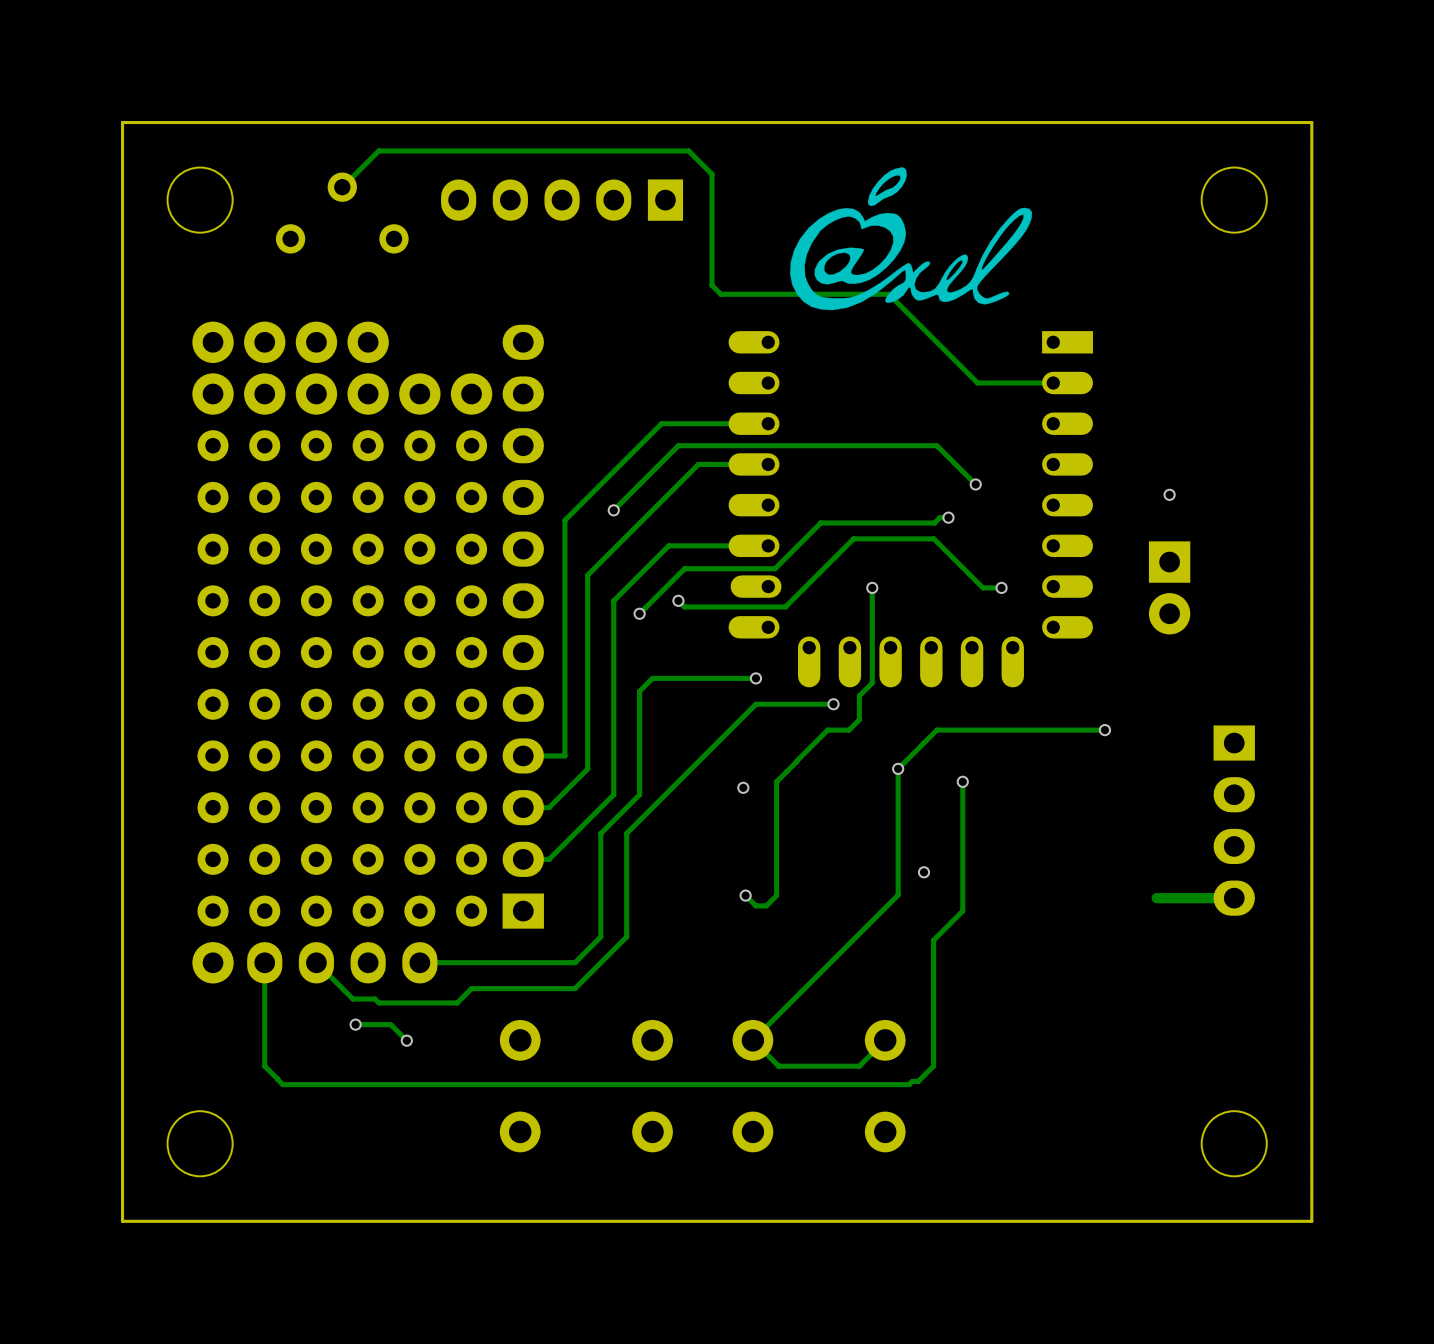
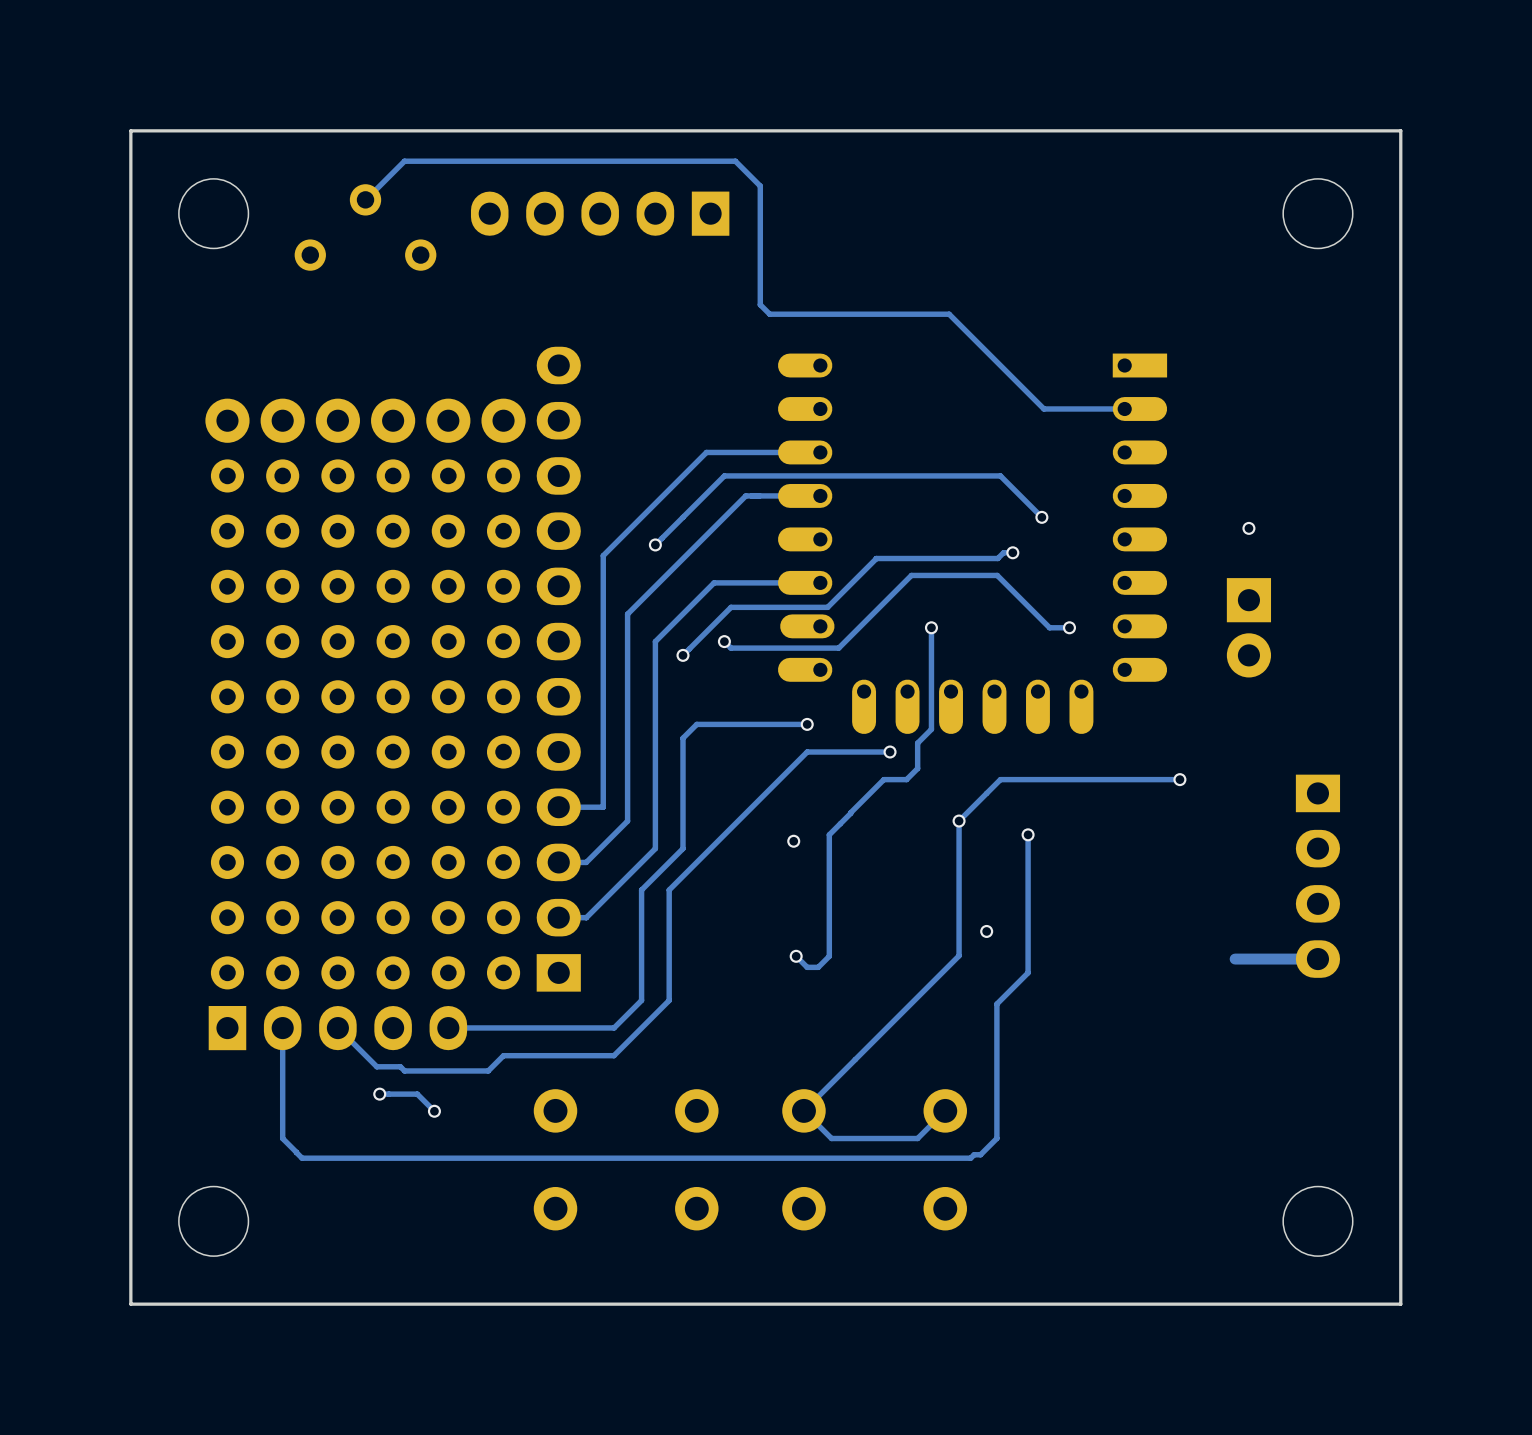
drawing: [790, 167, 1033, 311] -> none
part: (290, 342) -> none
part footprint: [192, 942, 438, 984] -> [208, 1006, 468, 1051]

